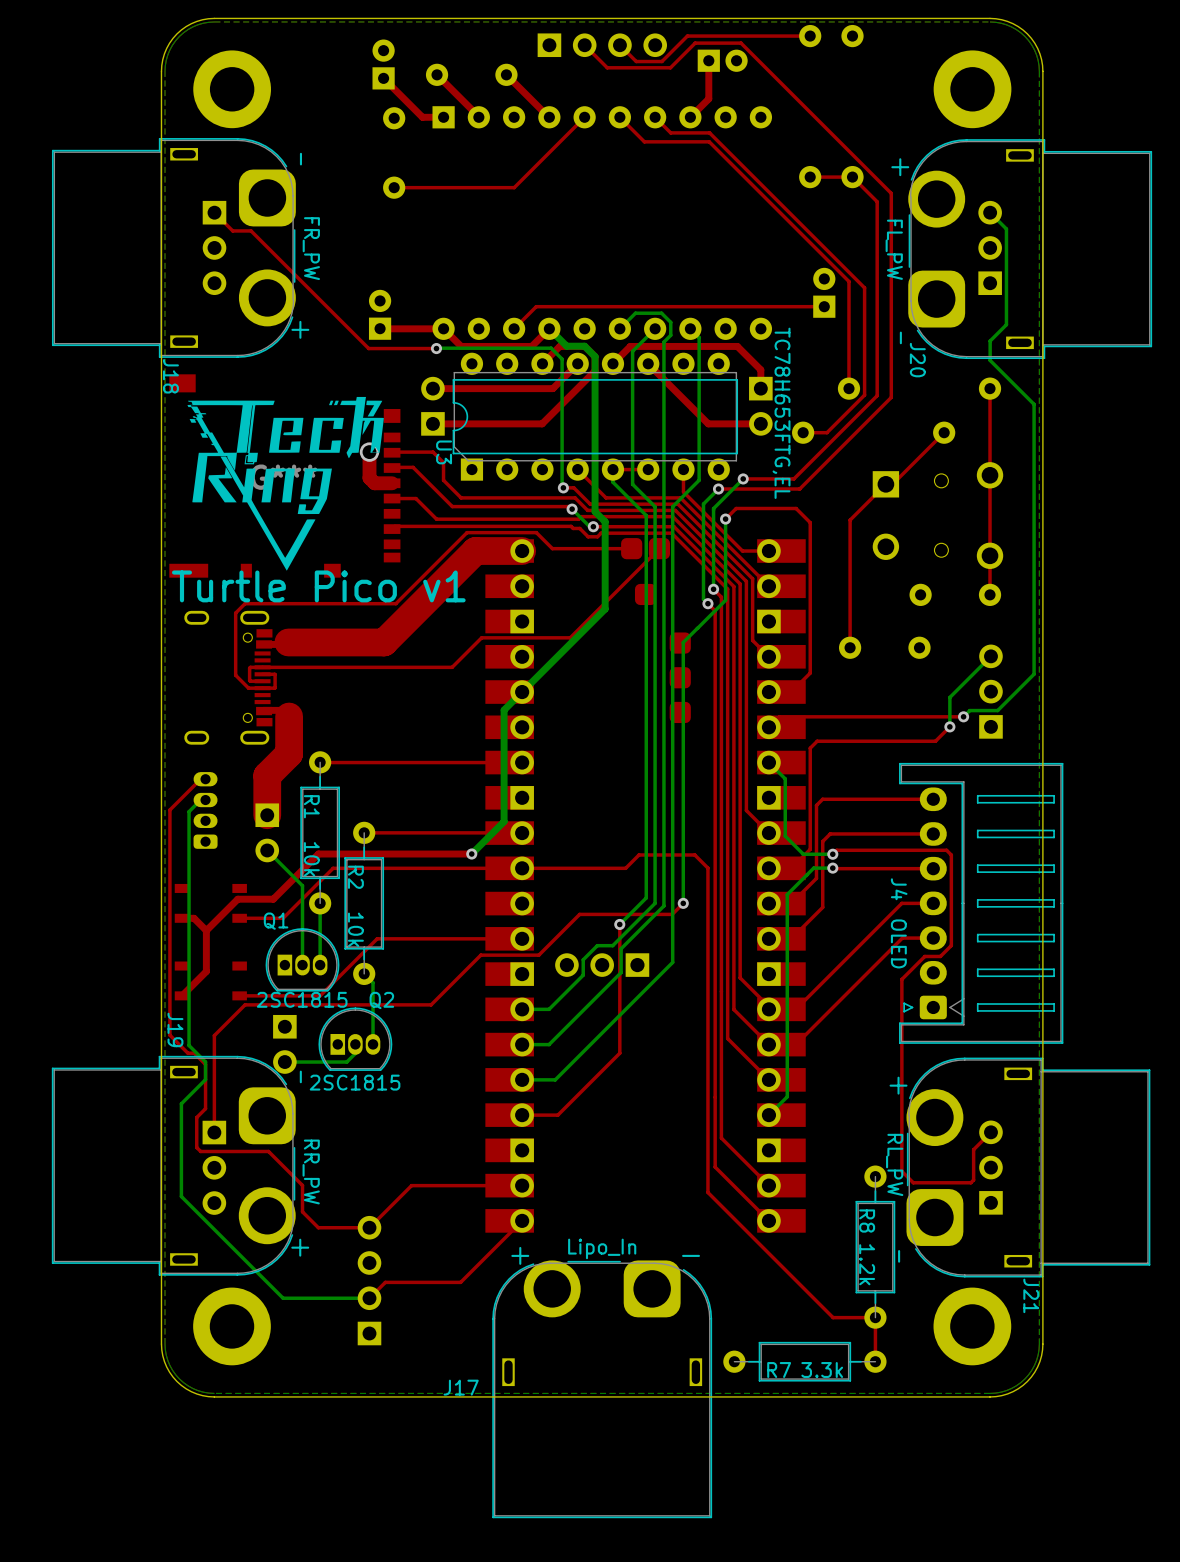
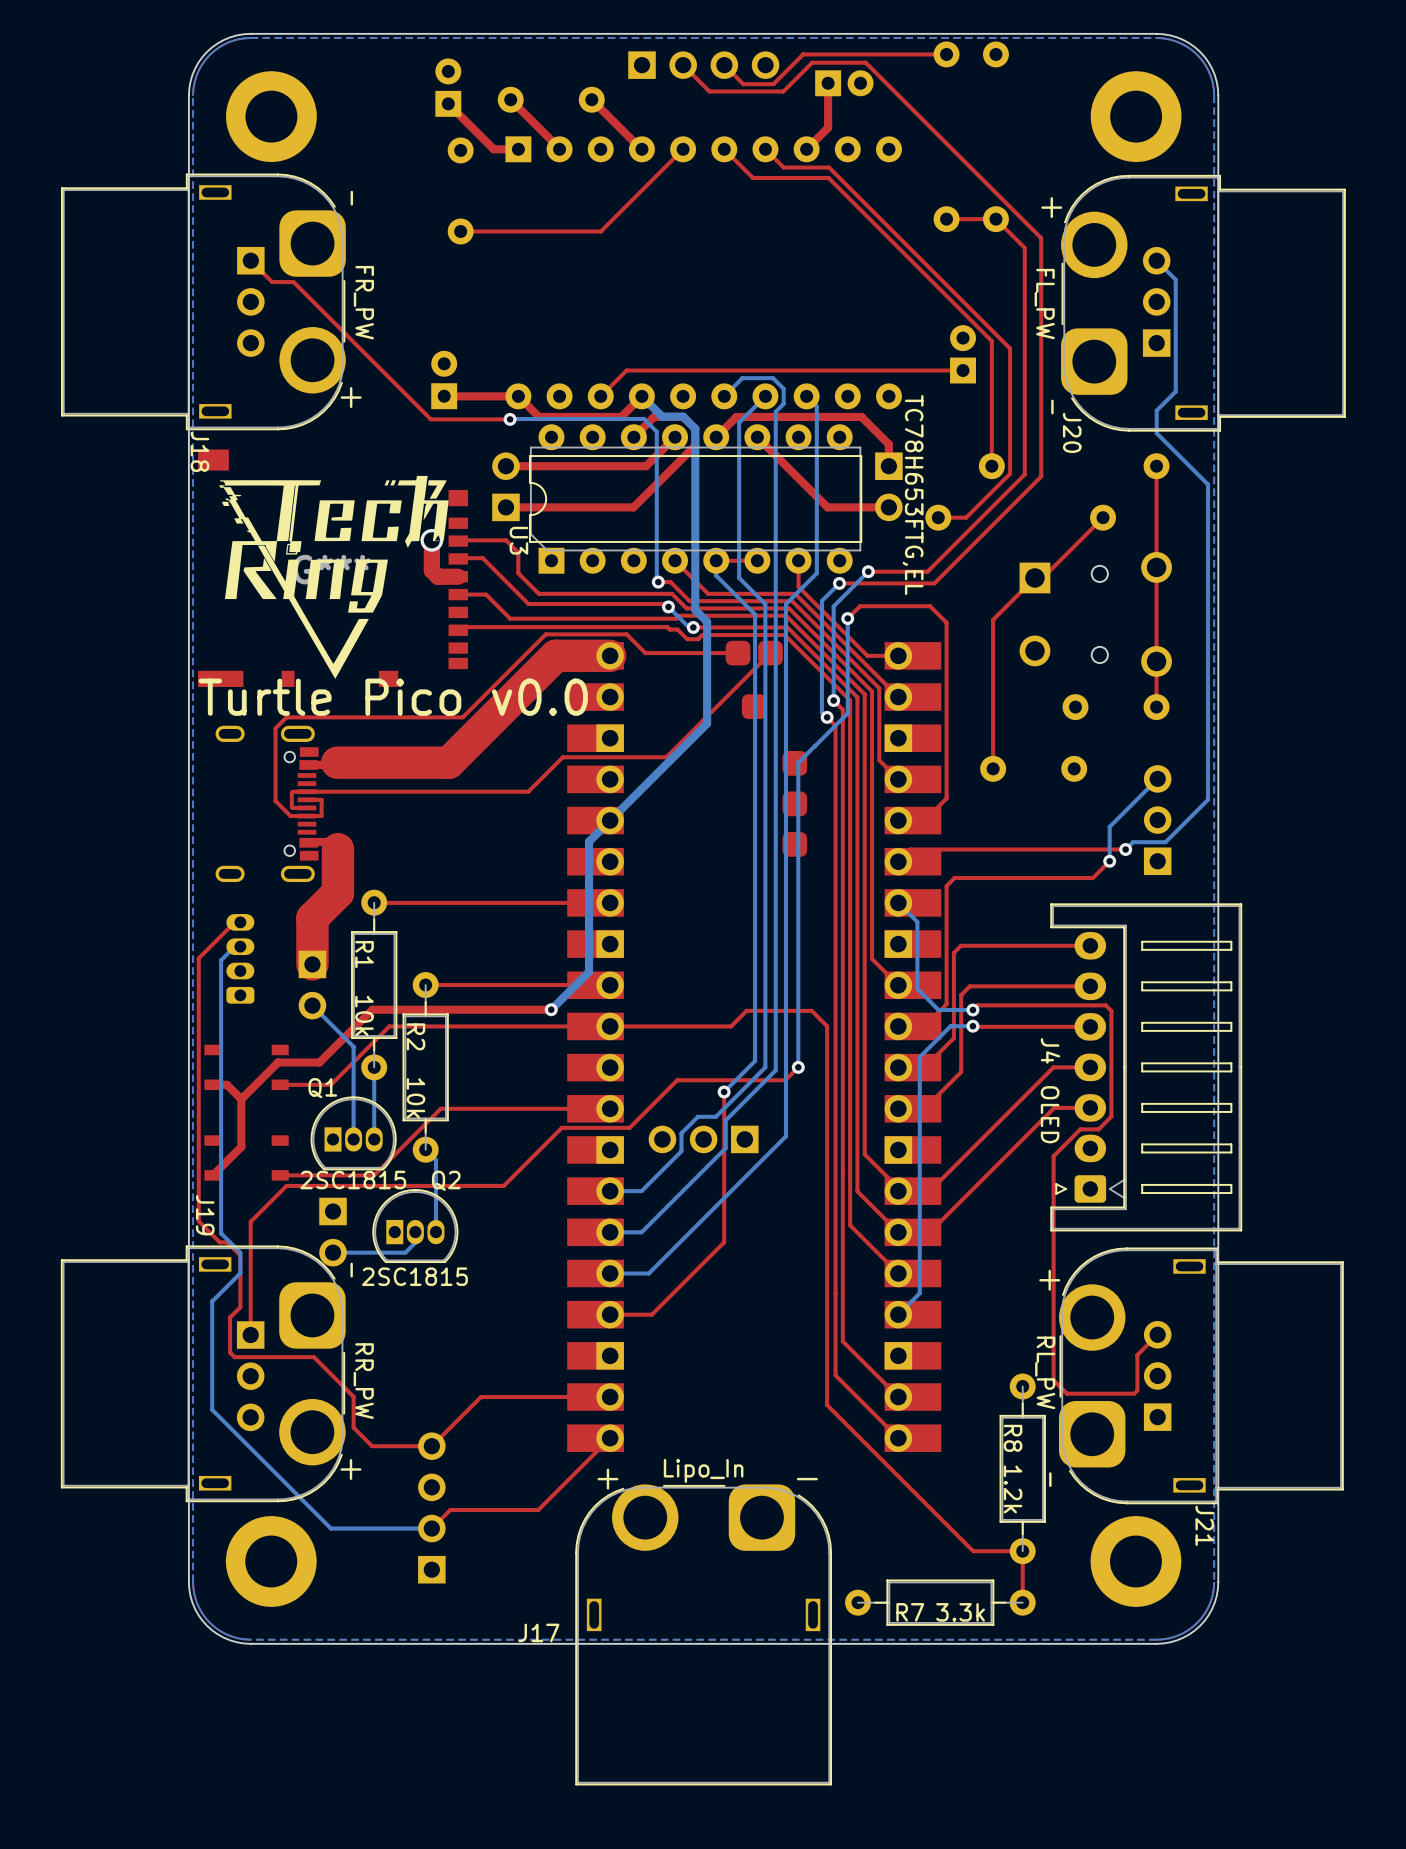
text: Turtle Pico v1 (318, 586) -> Turtle Pico v0.0 (393, 697)

